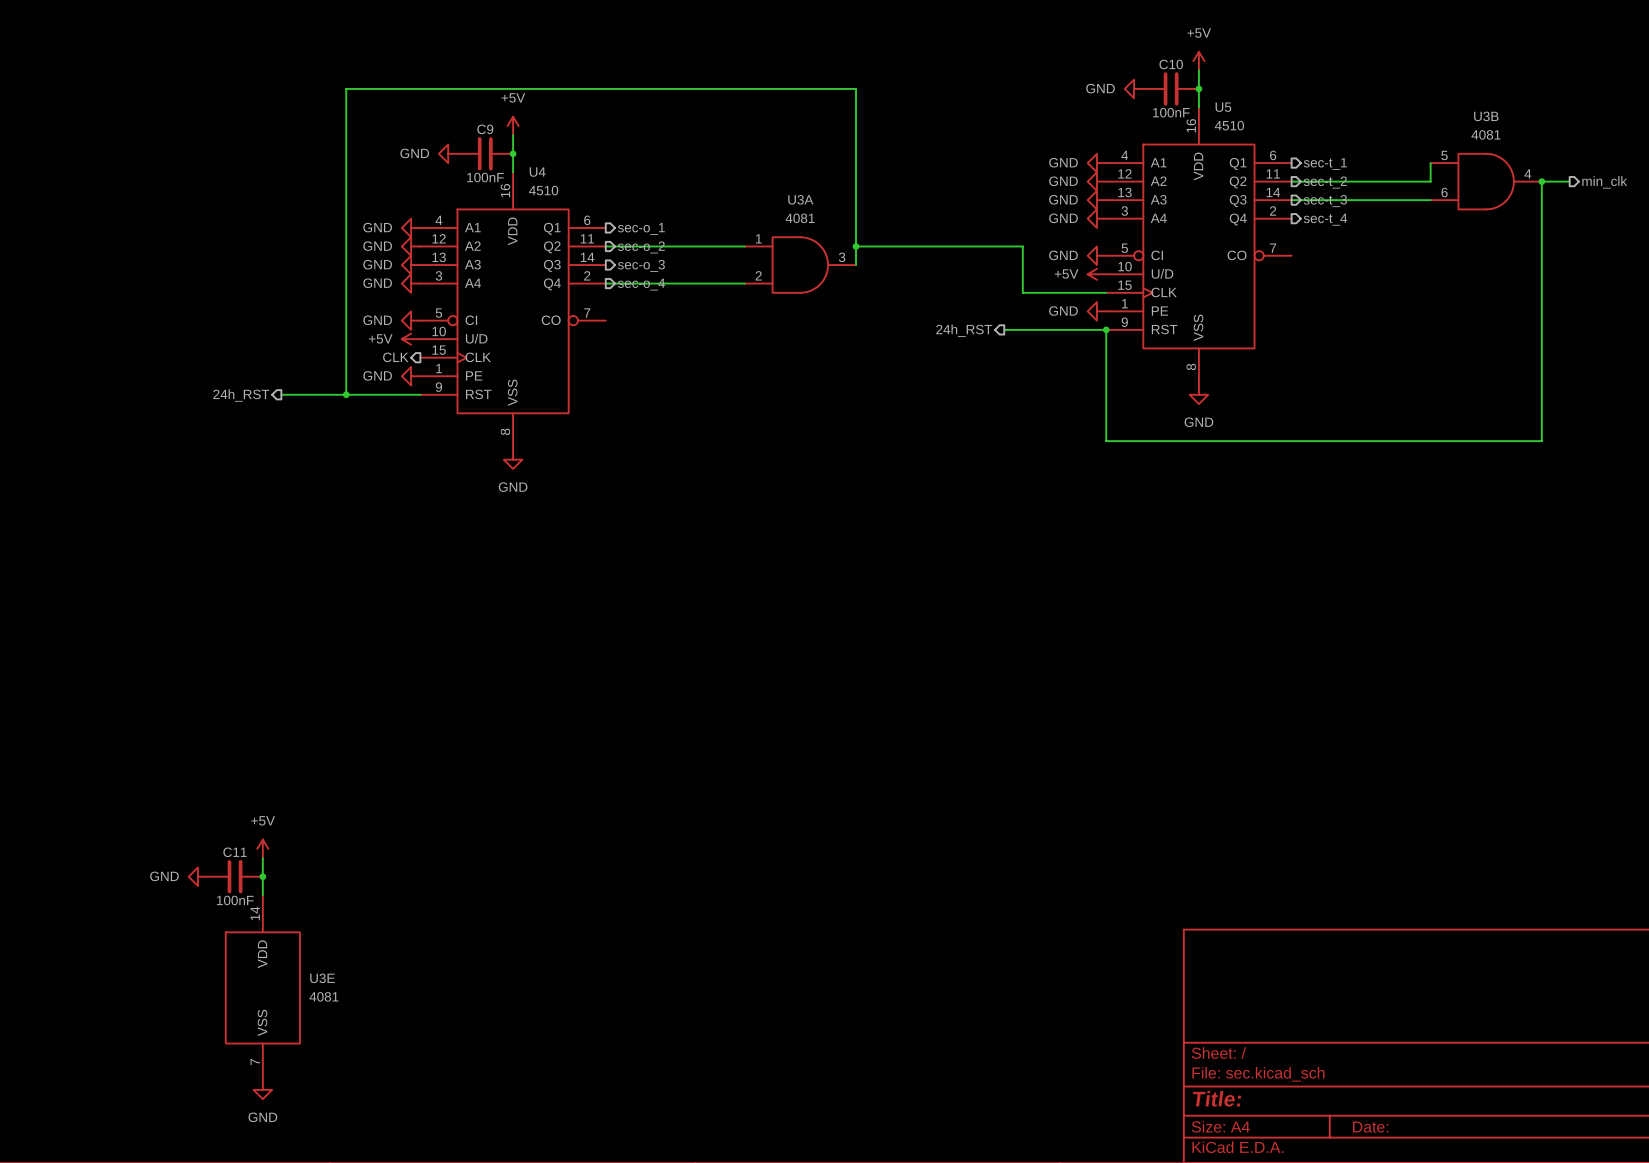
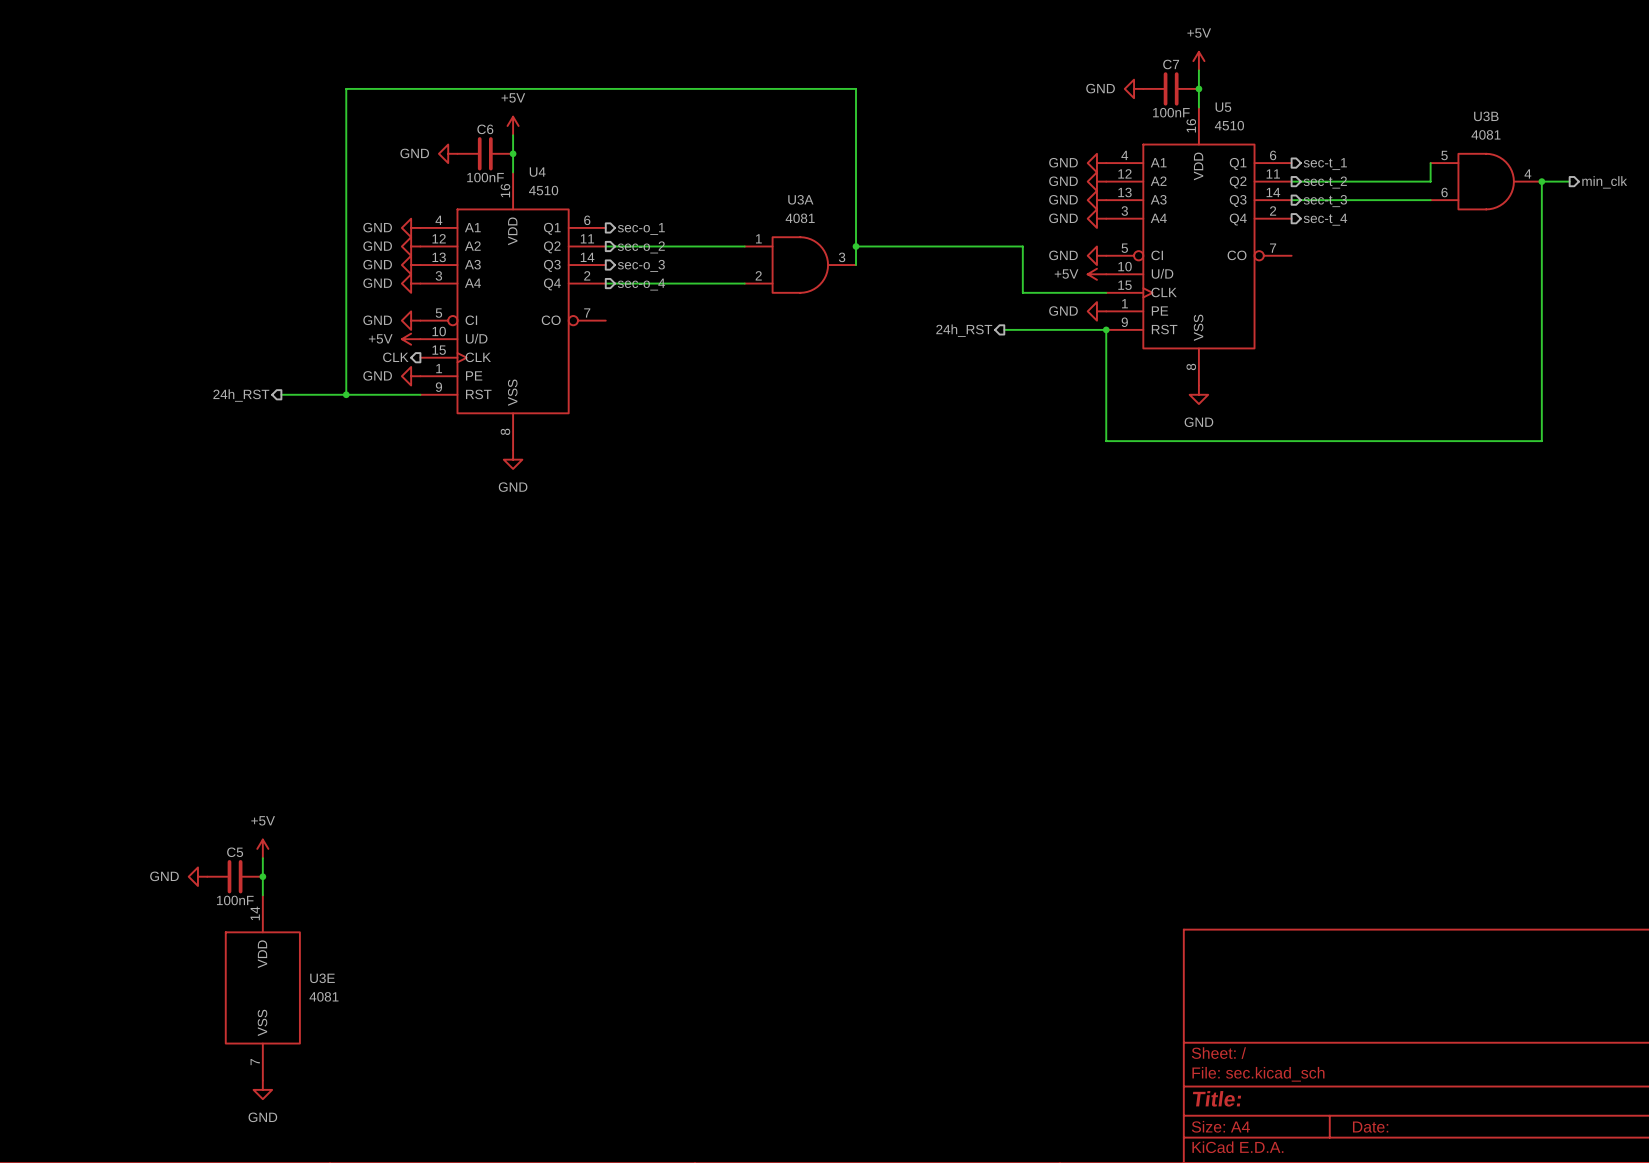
C10 name: C10 (1171, 64) -> C7 (1171, 64)
C9 name: C9 (485, 129) -> C6 (485, 129)
C11 name: C11 (235, 852) -> C5 (235, 852)

